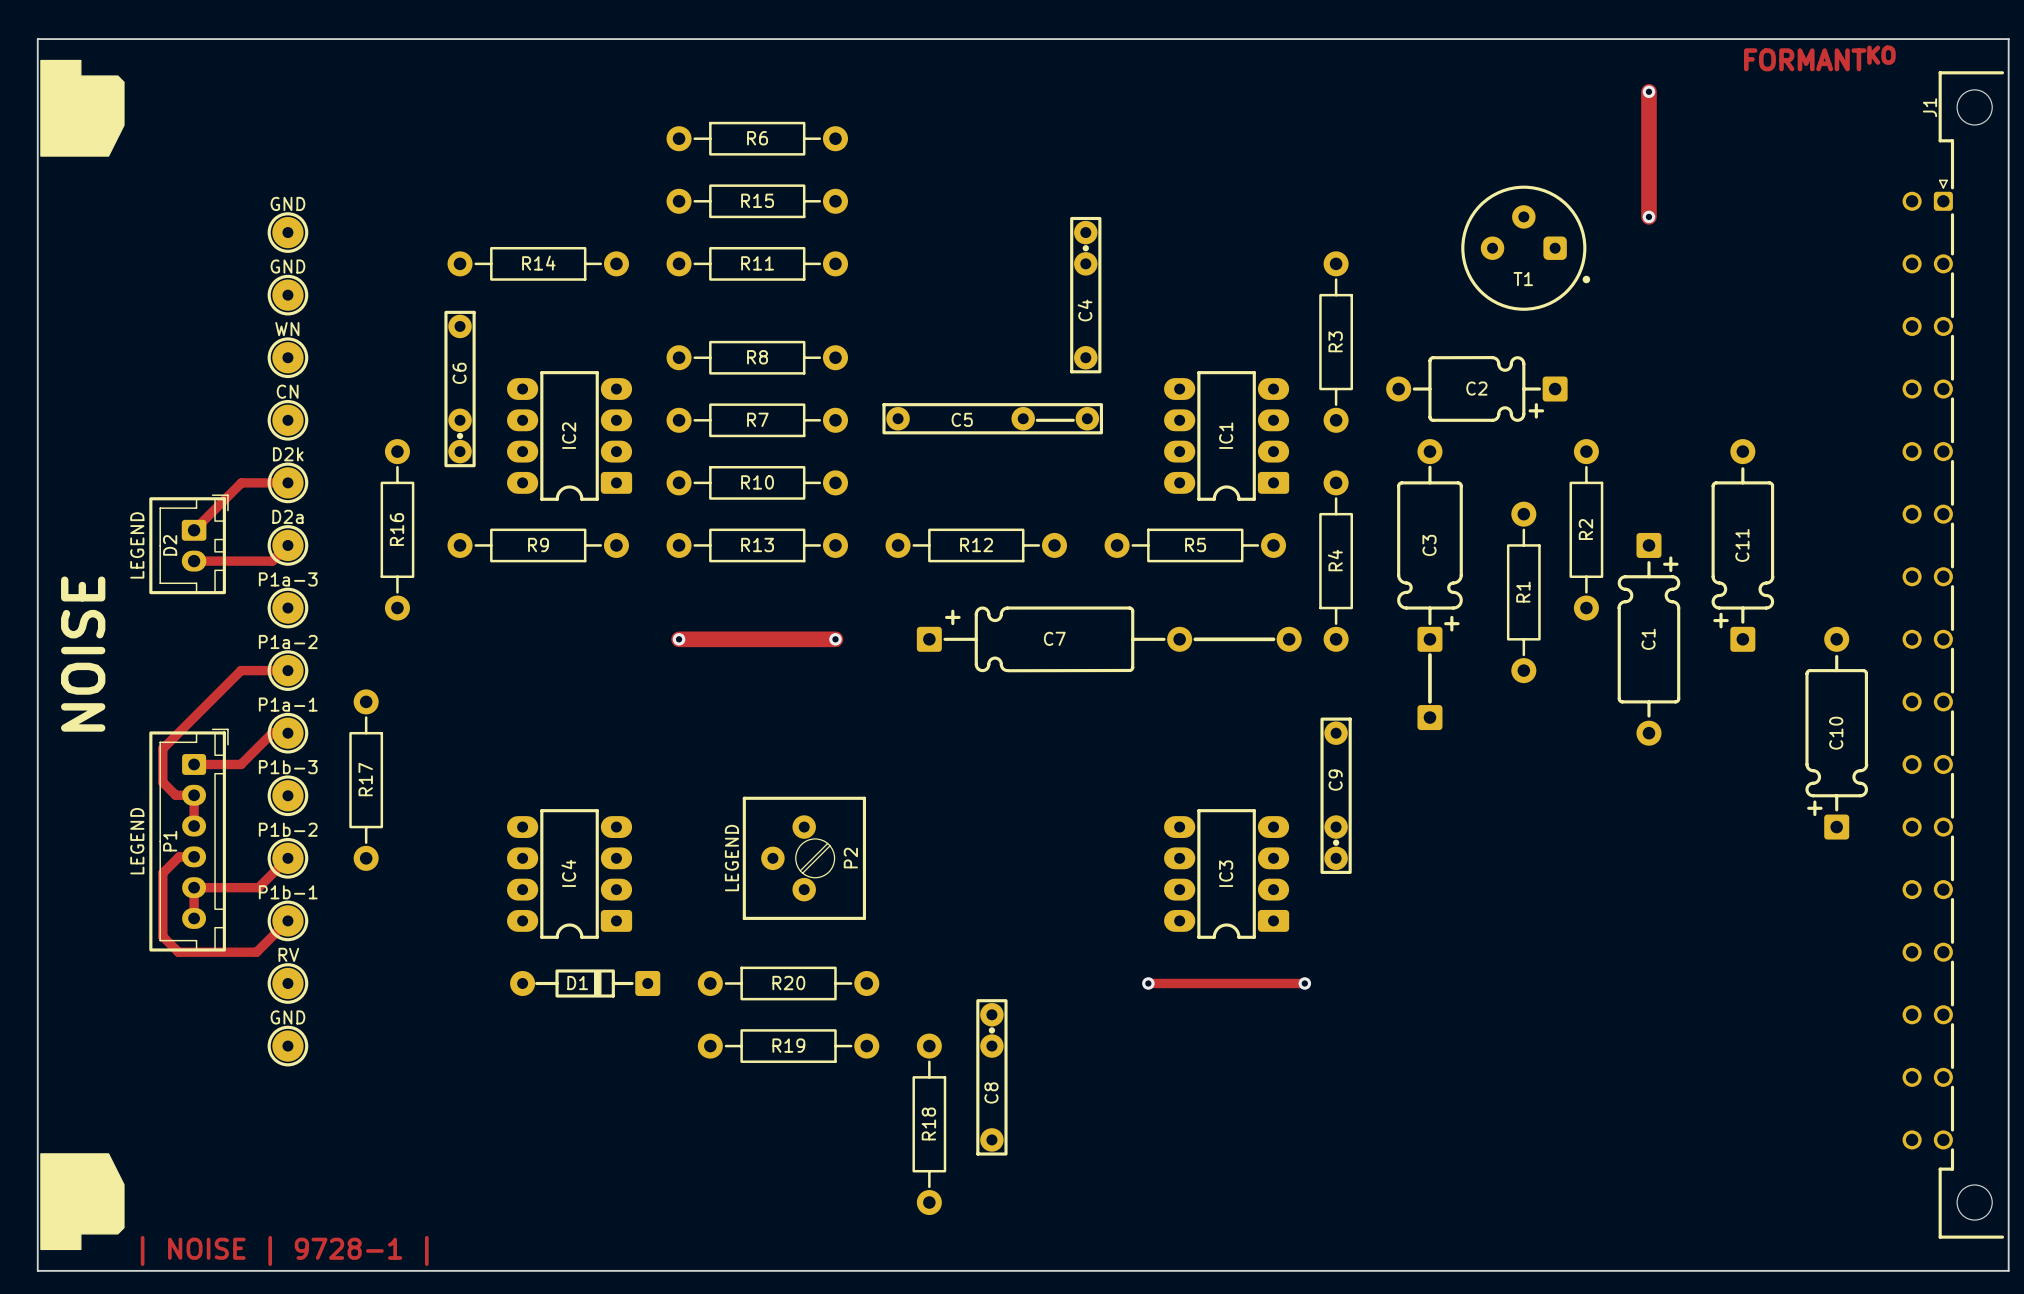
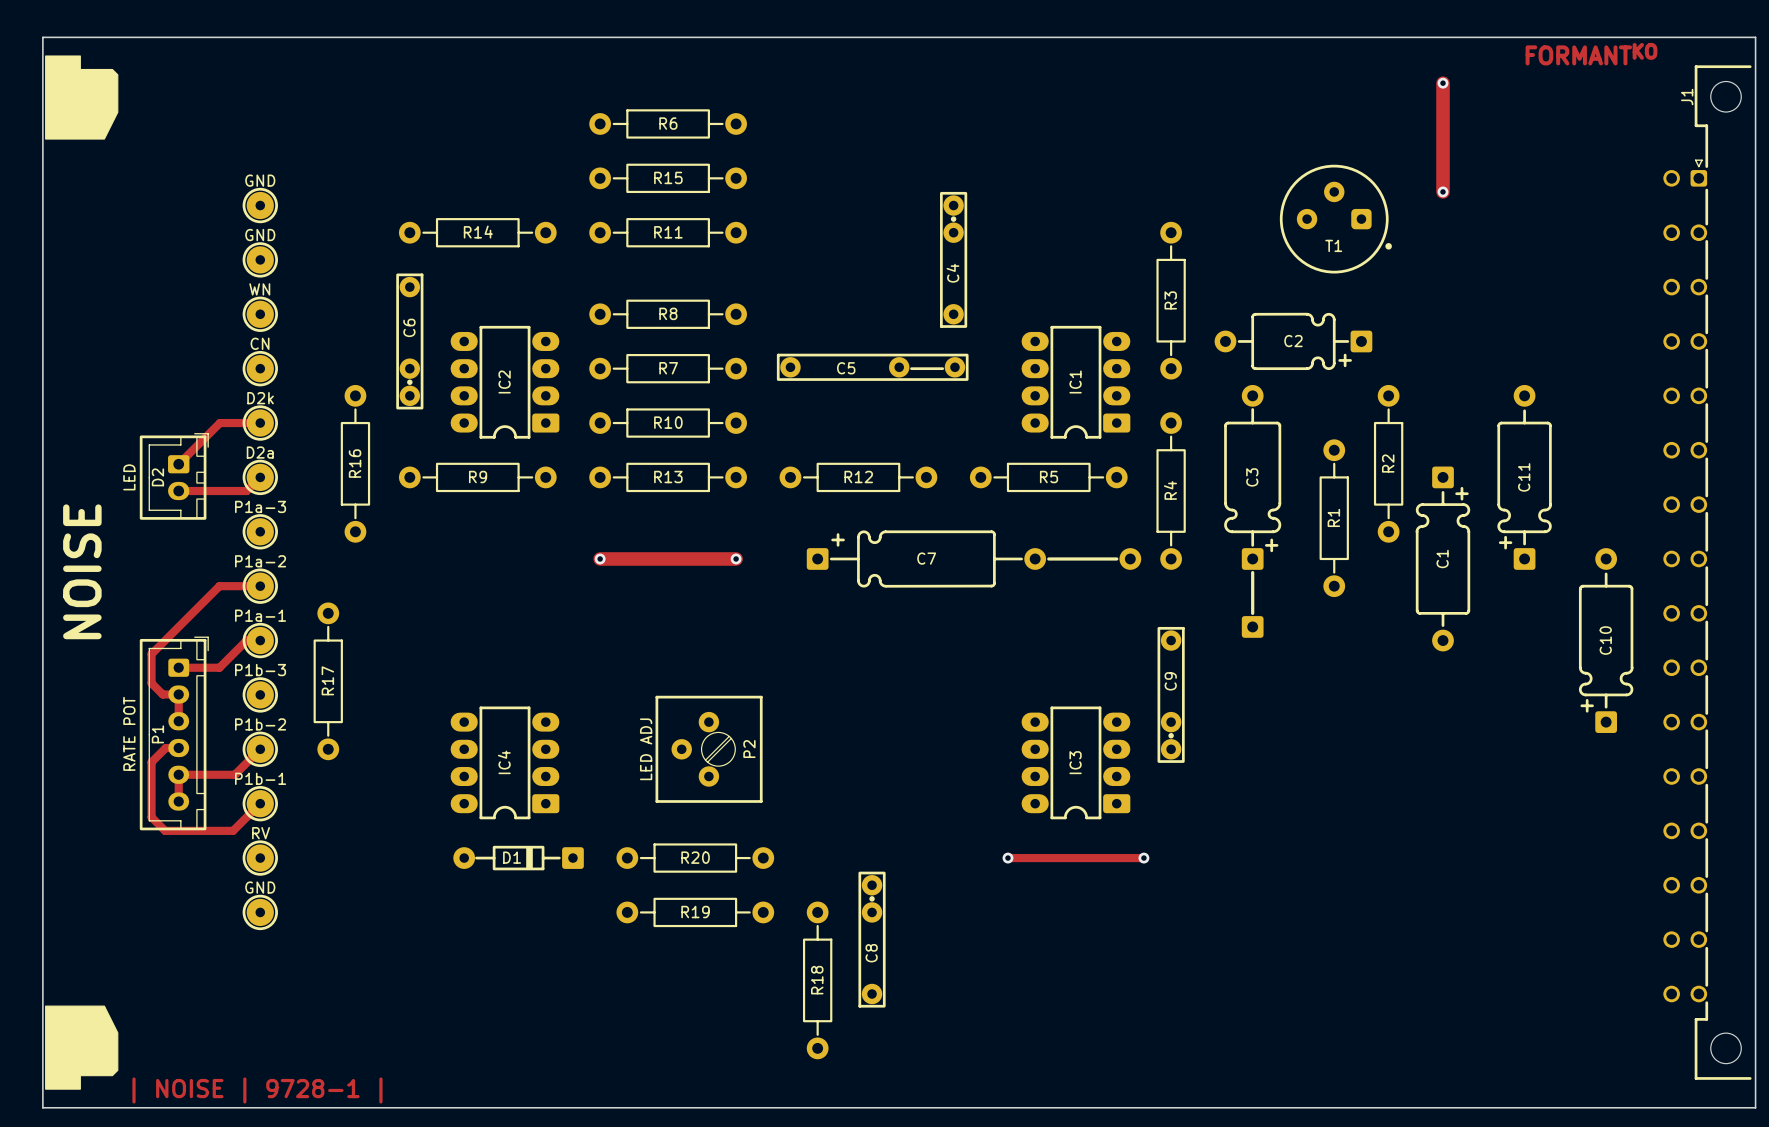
D2 text: LEGEND (137, 545) -> LED (129, 477)
P1 text: LEGEND (137, 841) -> RATE POT (129, 733)
P2 text: LEGEND (731, 858) -> LED ADJ (646, 749)

